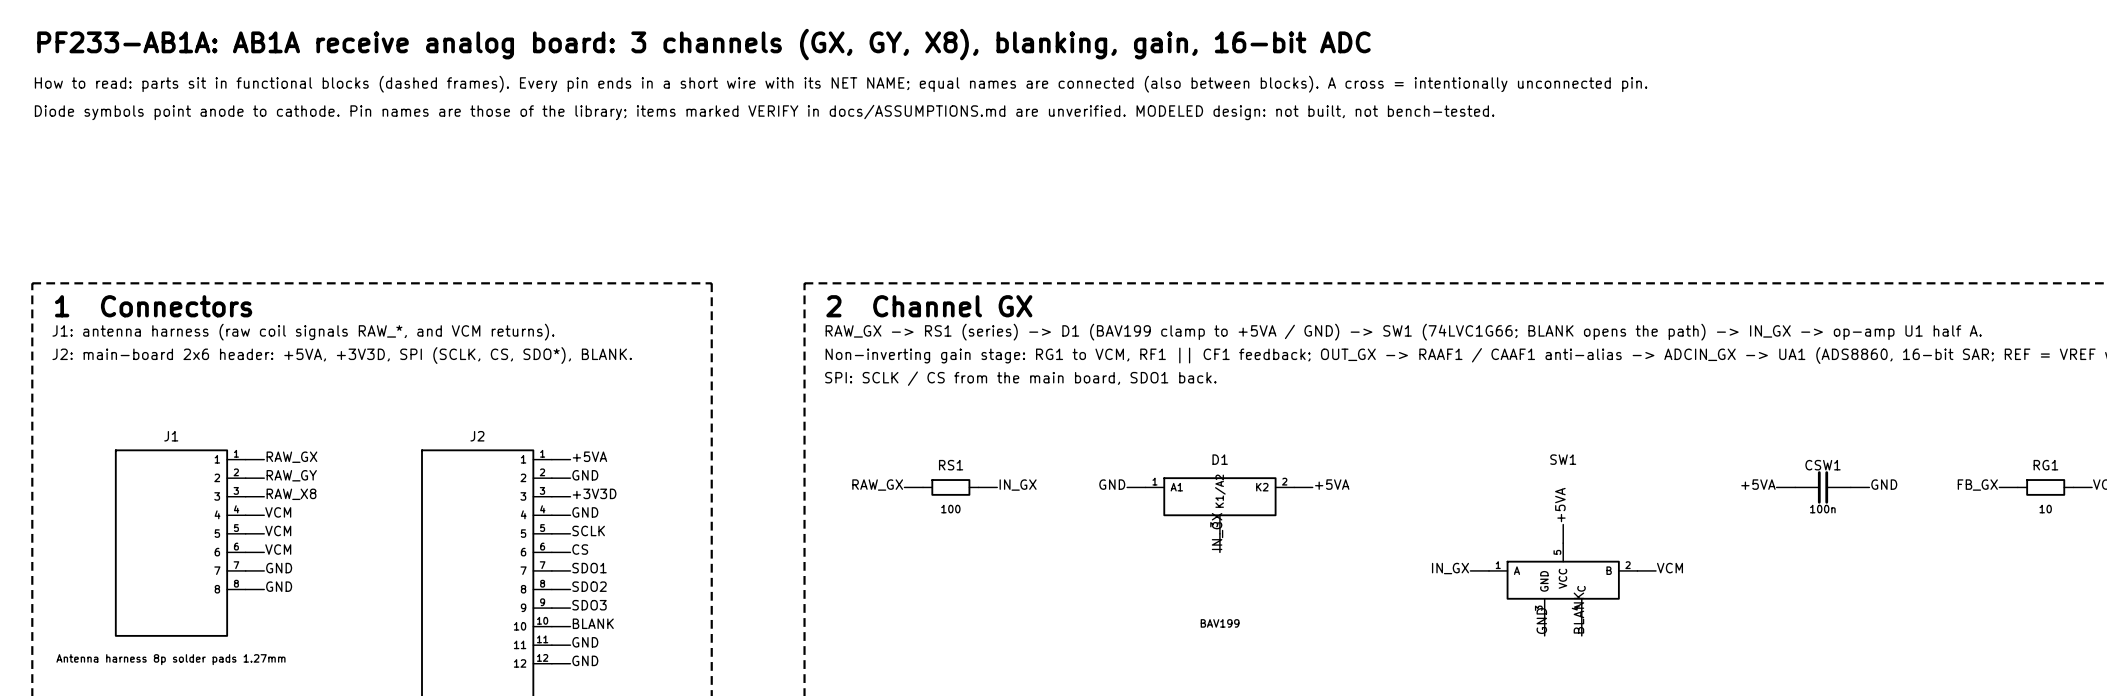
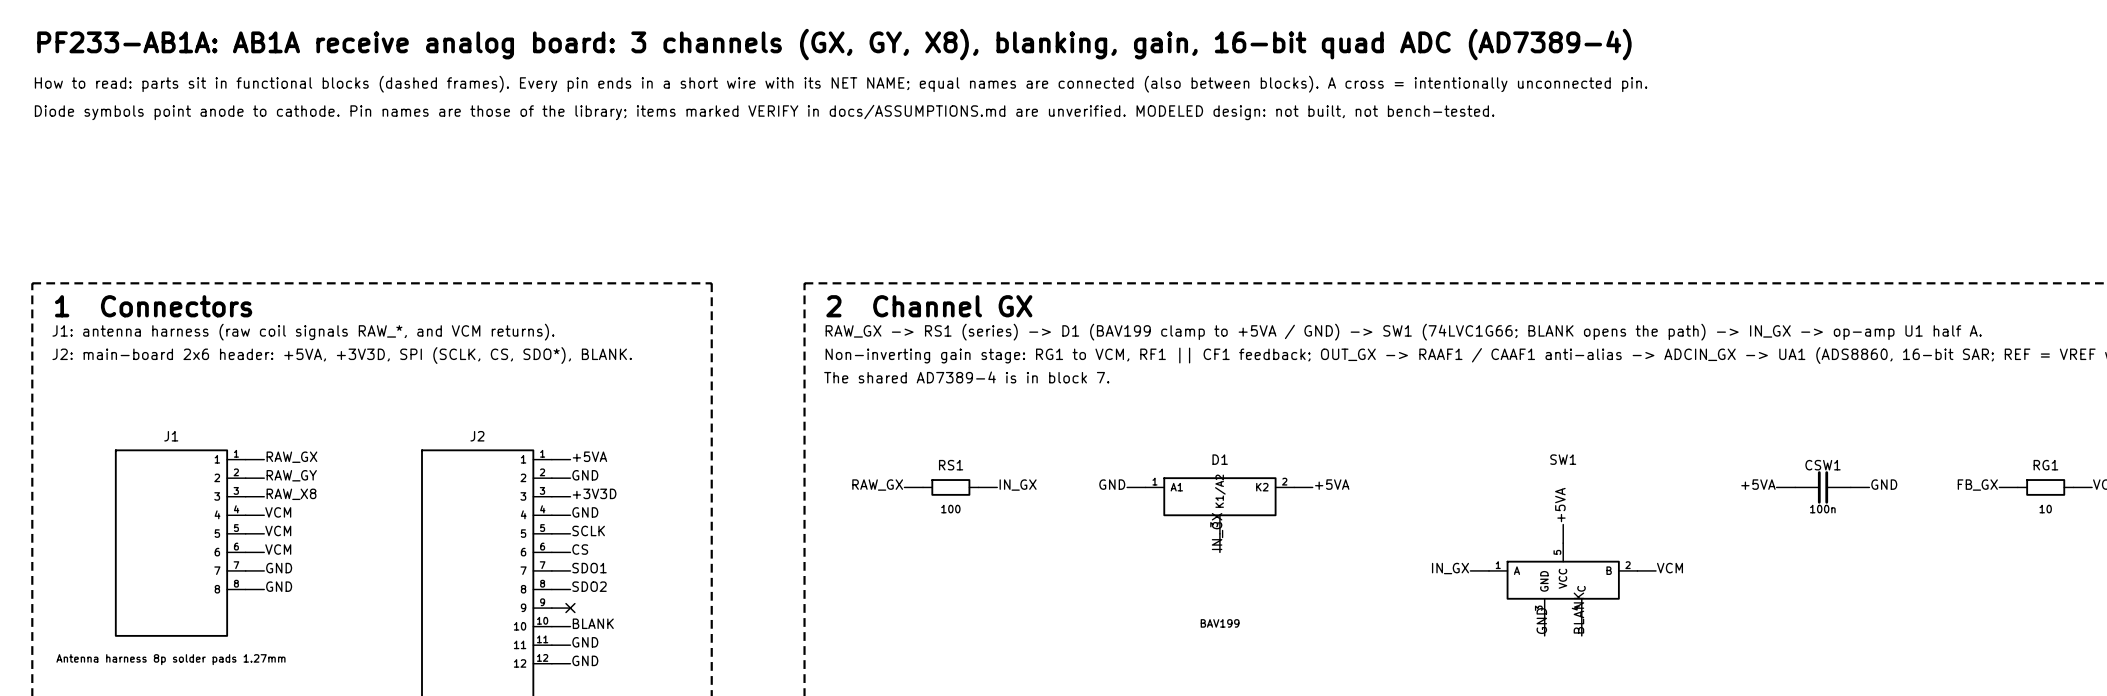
text: PF233-AB1A: AB1A receive analog board: 3 channels (GX, GY, X8), blanking, gain, 16-bit ADC (703, 44) -> PF233-AB1A: AB1A receive analog board: 3 channels (GX, GY, X8), blanking, gain, 16-bit quad ADC (AD7389-4) (834, 44)
text: SPI: SCLK / CS from the main board, SDO1 back. (1020, 378) -> The shared AD7389-4 is in block 7. (966, 377)
label: SDO3 (589, 605) -> none
no-connect mark: none -> (570, 608)

